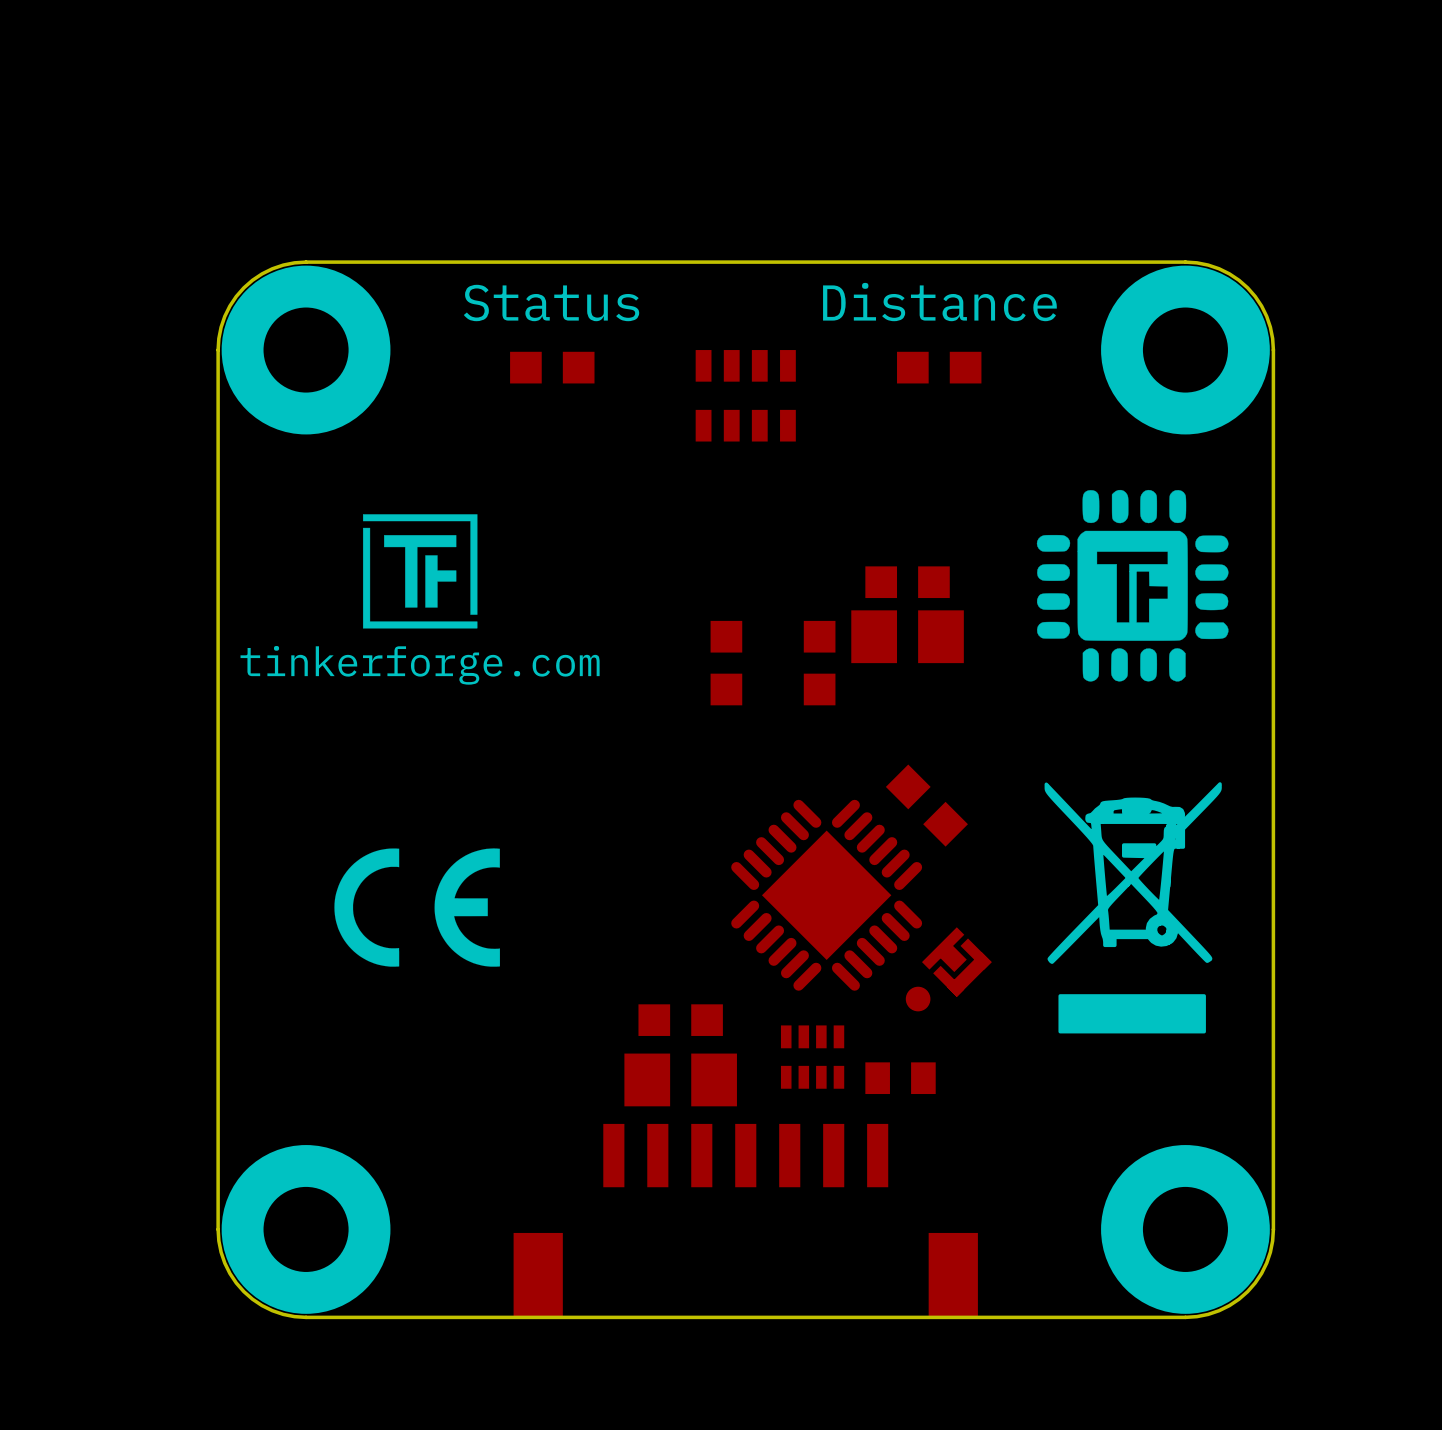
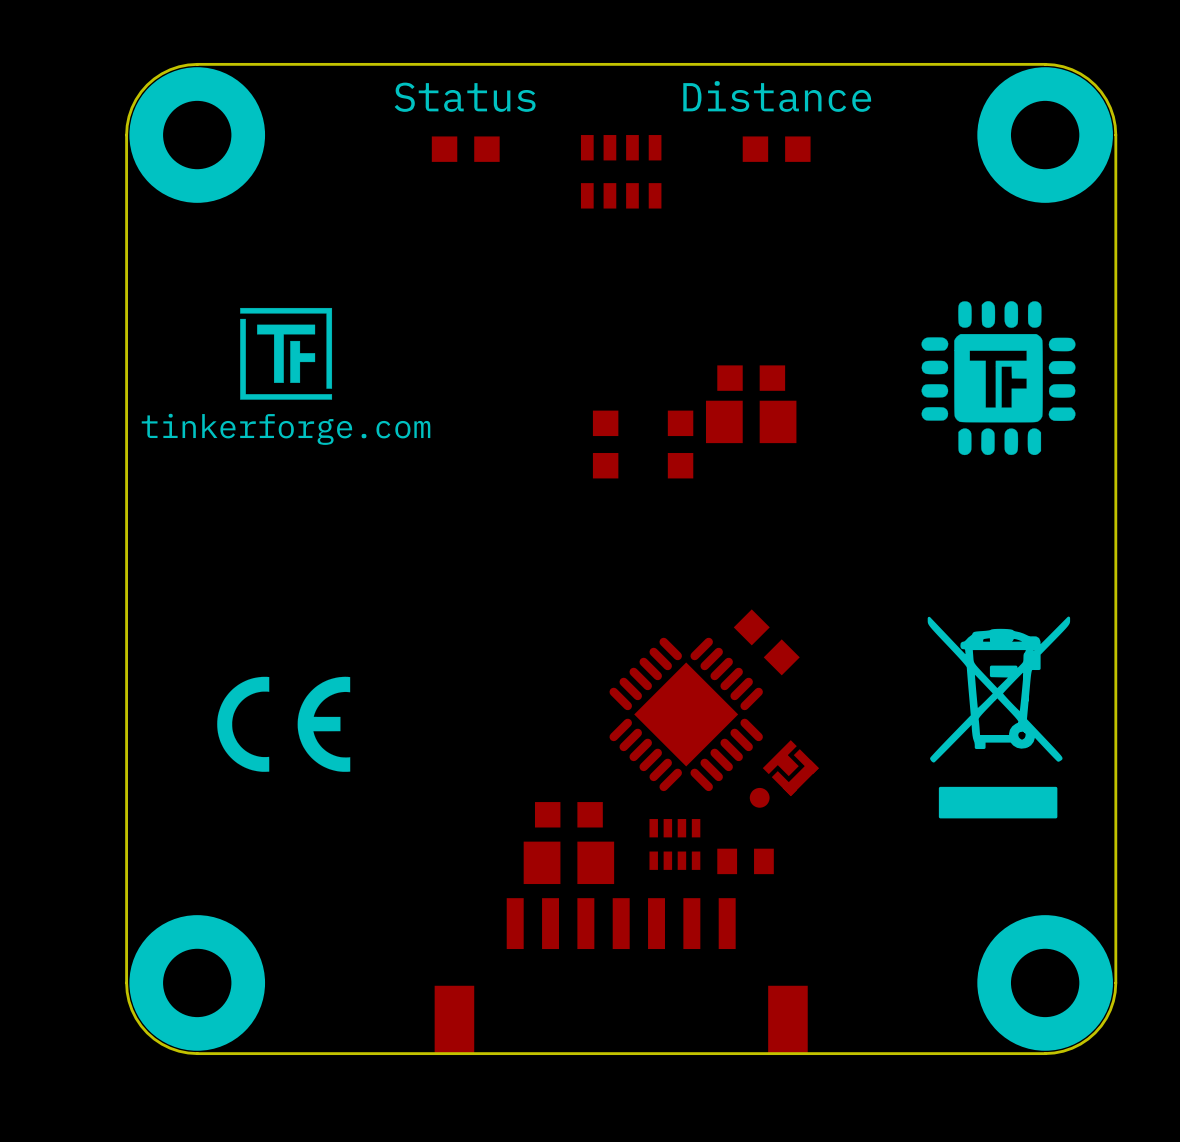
part: none -> (465, 149)
part: none -> (776, 149)
text position: Distance (939, 302) -> Distance (777, 96)
text position: Status (551, 303) -> Status (465, 97)
part position: (306, 350) -> (197, 135)
part position: (1185, 350) -> (1045, 135)
part: (552, 367) -> none
part: (939, 367) -> none
part position: (745, 395) -> (621, 171)
part: none -> (751, 378)
part: none -> (605, 444)
part: none -> (680, 444)
drawing position: (420, 571) -> (286, 353)
part: (907, 582) -> none
drawing position: (1132, 585) -> (998, 378)
part position: (907, 636) -> (751, 421)
part: (726, 663) -> none
part: (819, 663) -> none
text position: tinkerforge.com (420, 665) -> tinkerforge.com (286, 429)
drawing position: (417, 907) -> (283, 724)
drawing position: (1133, 907) -> (998, 717)
part position: (306, 1229) -> (197, 982)
part position: (1185, 1229) -> (1045, 982)
board edge: (306, 1317) (294, 1316) (272, 1310) (252, 1299) (243, 1291) (229, 1273) (224, 1263) (218, 1240) (218, 1229) (218, 338) (221, 327) (229, 306) (236, 296) (252, 280) (272, 268) (294, 262) (306, 262) (1185, 262) (1196, 262) (1219, 268) (1238, 280) (1255, 296) (1261, 306) (1270, 327) (1273, 350) (1272, 1240) (1270, 1252) (1261, 1273) (1255, 1282) (1238, 1299) (1219, 1310) (1196, 1316) (1185, 1317) -> (267, 1053) (197, 1053) (170, 1048) (154, 1039) (141, 1025) (131, 1009) (127, 992) (127, 125) (136, 99) (147, 85) (170, 69) (188, 64) (1045, 64) (1072, 69) (1088, 78) (1101, 92) (1113, 116) (1115, 135) (1115, 992) (1110, 1009) (1101, 1025) (1088, 1039) (1072, 1048) (1045, 1053) (974, 1053)

